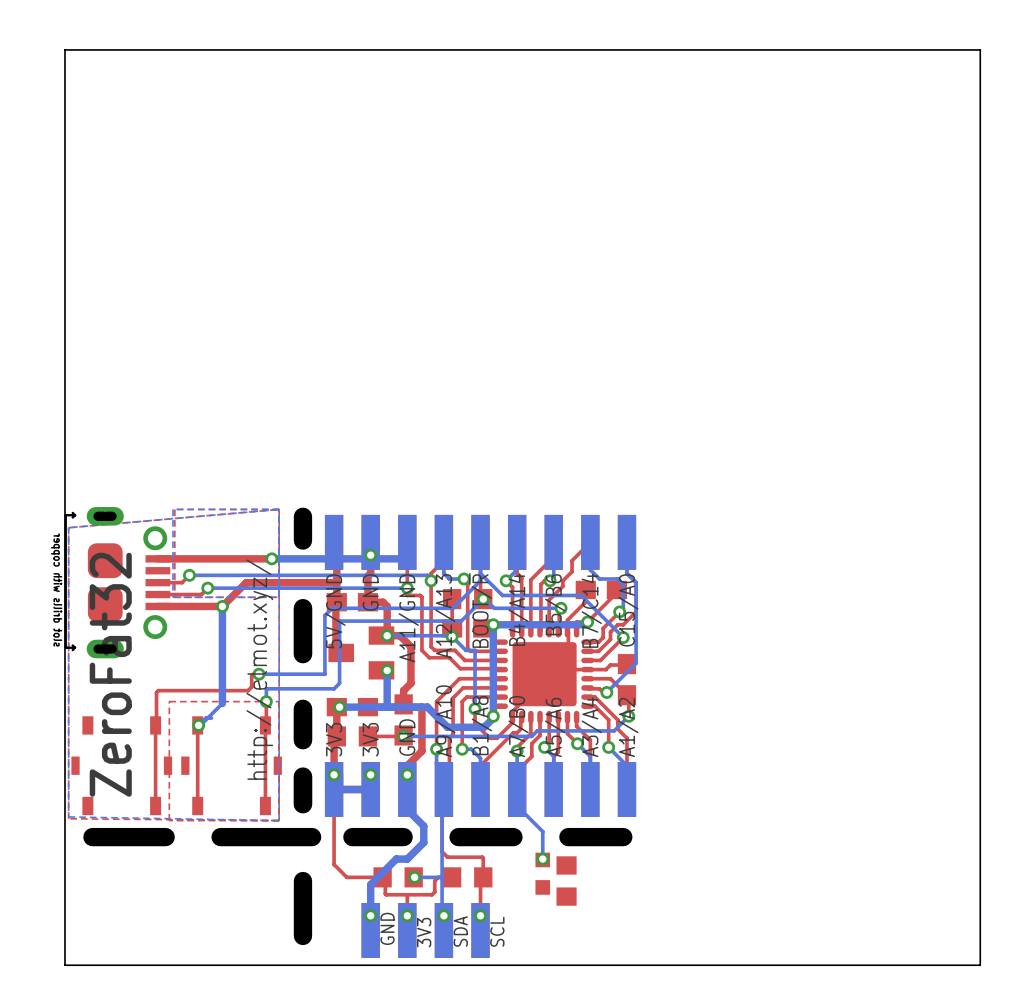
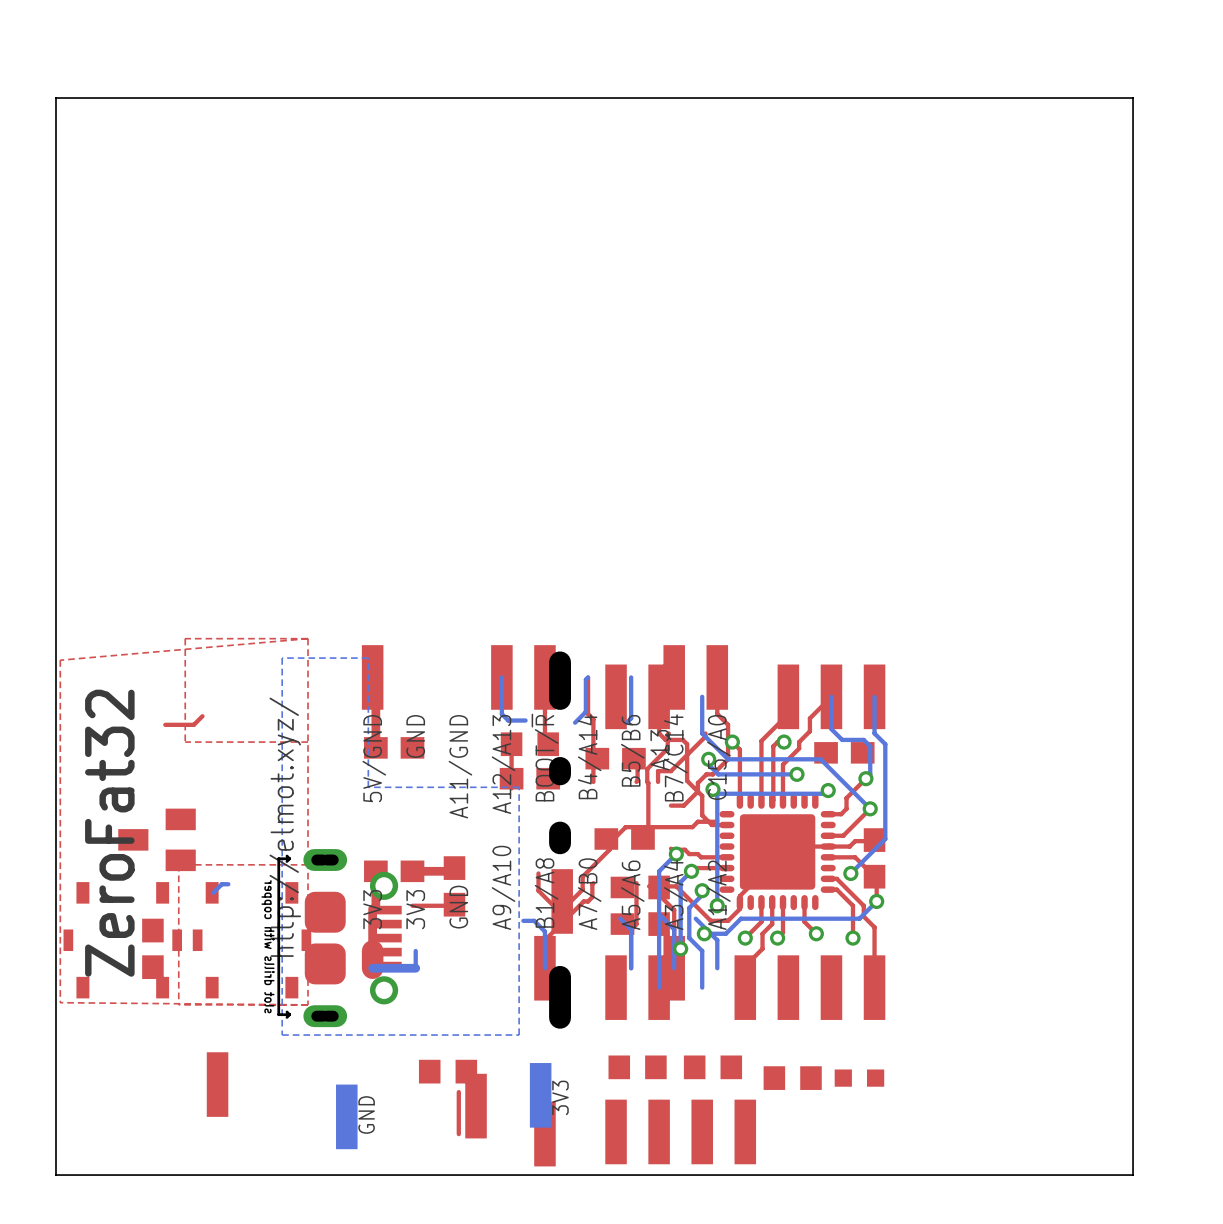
bottom zone outline: (279, 509) (68, 527) (68, 816) (279, 820) (279, 509) -> none
bottom zone outline: (279, 509) (172, 509) (172, 597) (279, 597) -> none
board edge: (302, 516) (302, 540) -> none
bottom zone outline: none -> (368, 658) (368, 787) (519, 787) (519, 1035) (282, 1035) (282, 658) (368, 658)
part: (334, 542) -> none
part: (370, 542) -> none
top track: (407, 542) (407, 595) (420, 595) (421, 597) (421, 650) (429, 657) (449, 657) (460, 668) (501, 669) -> none
bottom track: (407, 542) (407, 558) (271, 558) -> none
part side: bottom (407, 542) -> top (217, 1084)
top track: (443, 542) (443, 560) (431, 573) (431, 646) (434, 650) (454, 650) (464, 660) (501, 660) -> none
part side: bottom (443, 542) -> top (659, 696)
bottom track: (480, 542) (480, 580) (453, 608) (332, 608) (324, 615) (324, 674) (259, 674) -> none
part: (480, 542) -> none
part: (517, 542) -> none
top track: (553, 542) (553, 557) (530, 579) (530, 631) -> (788, 696) (788, 714) (761, 740) (761, 801)
part: (553, 542) -> none
top track: (590, 542) (572, 560) (572, 571) (562, 580) (562, 586) (549, 600) (549, 631) -> (831, 696) (809, 718) (809, 731) (799, 742) (799, 748) (782, 764) (782, 801)
bottom track: (590, 542) (590, 569) (599, 578) (617, 578) (623, 584) (623, 608) (619, 611) -> (831, 696) (831, 729) (842, 739) (863, 739) (870, 746) (870, 774) (865, 778)
part: (590, 542) -> none
bottom track: (626, 542) (626, 573) (636, 582) (636, 663) (606, 692) -> (874, 696) (874, 733) (885, 744) (885, 839) (850, 873)
part: (626, 542) -> none
top track: (370, 555) (370, 542) (367, 602) (382, 602) (387, 606) (387, 635) (399, 635) (410, 646) (410, 683) (403, 690) (403, 708) (405, 707) (421, 707) (421, 751) (407, 765) (407, 789) -> none
via: (370, 555) -> none
top track: (271, 558) (157, 558) -> none
via: (271, 558) -> none
part: none -> (616, 696)
top track: none -> (659, 696) (659, 733) (665, 739) (682, 739) (687, 744) (687, 780) (702, 795) (702, 815) (711, 825) (726, 825) (725, 826)
bottom track: none -> (702, 696) (702, 733) (728, 759) (820, 759) (870, 808)
part: none -> (788, 696)
part: none -> (831, 696)
part: none -> (874, 696)
bottom track: (480, 573) (502, 595) (581, 595) (623, 637) -> none
bottom track: (189, 575) (427, 575) (431, 580) -> none
via: (189, 575) -> none
top track: (464, 578) (467, 582) (467, 648) (470, 651) (500, 652) -> none
via: (464, 578) -> none
via: (431, 580) -> none
top track: (506, 580) (512, 587) (512, 631) -> (732, 742) (739, 749) (739, 801)
via: (506, 580) -> none
top track: (550, 580) (544, 580) (540, 584) (540, 631) -> (784, 742) (777, 742) (773, 746) (772, 801)
via: (550, 580) -> none
part position: (117, 582) -> (339, 938)
top track: (336, 582) (246, 582) (222, 606) (157, 606) -> none
top track: (207, 588) (201, 594) (157, 594) -> none
via: (207, 588) -> none
bottom track: (407, 588) (207, 588) -> none
via: (407, 588) -> none
part: (601, 589) -> none
via: none -> (732, 742)
via: none -> (784, 742)
via: (483, 599) -> none
bottom track: (222, 606) (222, 703) (202, 723) (202, 727) -> none
via: (222, 606) -> none
top track: (332, 606) (335, 605) (335, 604) (336, 603) (336, 602) (335, 647) (341, 652) -> none
part: none -> (844, 752)
board edge: (302, 608) (302, 654) -> none
bottom track: (561, 608) (494, 608) (483, 599) (461, 621) (339, 621) (339, 683) (334, 688) (266, 688) (266, 701) -> none
via: (561, 608) -> none
part: none -> (615, 758)
top track: (619, 611) (603, 628) (603, 637) (598, 642) (587, 642) -> (865, 778) (846, 798) (846, 808) (841, 814) (828, 814)
bottom track: none -> (705, 761) (718, 774) (796, 774)
board edge: none -> (560, 767) (560, 774)
bottom track: (587, 622) (584, 624) (493, 624) -> none
via: (587, 622) -> none
bottom track: (493, 624) (493, 718) (484, 727) (447, 727) (427, 707) (339, 707) -> none
via: (493, 624) -> none
part footprint: [495, 624, 595, 724] -> [594, 828, 655, 850]
via: none -> (796, 774)
via: none -> (865, 778)
bottom track: (387, 635) (451, 635) (465, 650) (475, 650) (475, 708) -> none
via: (387, 635) -> none
via: (452, 636) -> none
top track: (623, 637) (600, 660) (587, 660) -> (870, 808) (843, 835) (828, 835)
bottom track: none -> (828, 790) (824, 793) (717, 793) (717, 905)
via: none -> (828, 790)
part position: (361, 652) -> (157, 839)
via: none -> (870, 808)
bottom track: (387, 670) (387, 707) -> none
via: (387, 670) -> none
top track: (259, 674) (251, 676) (251, 686) (248, 690) (158, 690) (156, 692) (155, 805) -> none
via: (259, 674) -> none
board edge: none -> (560, 832) (560, 843)
top track: (501, 678) (459, 678) (436, 701) (436, 749) -> none
top track: (587, 678) (610, 678) (628, 697) (628, 716) -> (828, 857) (855, 857) (876, 878) (876, 901)
part: (626, 679) -> none
top track: none -> (874, 840) (855, 841) (849, 846) (782, 846) (766, 862) (766, 869) (739, 896) (739, 909) (728, 920) (710, 920) (676, 886) (649, 886) (659, 887)
top track: (501, 687) (463, 687) (453, 697) (453, 734) (449, 738) (449, 774) (443, 780) (442, 851) (447, 857) (483, 858) (483, 877) (480, 880) (480, 930) (477, 930) -> none
part: none -> (777, 851)
bottom track: none -> (676, 854) (659, 871) (659, 987)
via: none -> (676, 854)
top track: none -> (693, 854) (697, 854) (701, 857) (726, 857)
via: (606, 692) -> none
part: none -> (874, 858)
top track: (501, 697) (466, 697) (462, 701) (462, 749) -> none
top track: (587, 697) (594, 697) (617, 719) (617, 729) (626, 738) (626, 789) -> (828, 878) (836, 878) (863, 905) (863, 916) (874, 927) (874, 987)
top track: (266, 701) (265, 805) -> none
via: (266, 701) -> none
top track: none -> (726, 868) (694, 868) (691, 871)
top track: (587, 706) (594, 706) (608, 719) (608, 747) -> (828, 889) (836, 889) (852, 905) (852, 938)
via: (339, 707) -> none
bottom track: none -> (691, 871) (680, 882) (680, 948)
via: none -> (691, 871)
board edge: (302, 708) (302, 740) -> (560, 662) (560, 698)
via: (475, 708) -> none
via: none -> (850, 873)
via: (493, 716) -> none
bottom track: (628, 716) (614, 730) (537, 730) (531, 736) (403, 736) -> none
via: (628, 716) -> none
top track: (530, 717) (530, 733) (517, 747) (517, 751) -> none
top track: (540, 717) (540, 735) (531, 743) (531, 756) (517, 771) (517, 789) -> (772, 902) (772, 924) (762, 933) (762, 948) (745, 966) (745, 987)
top track: (549, 717) (549, 742) (544, 747) -> (782, 902) (782, 932) (777, 938)
top track: (567, 717) (567, 733) (577, 743) -> (804, 902) (804, 921) (816, 933)
top track: (196, 719) (197, 805) -> none
bottom track: none -> (702, 890) (702, 895) (689, 907) (689, 938) (702, 951) (702, 987)
via: none -> (702, 890)
via: (198, 725) -> none
part: none -> (562, 901)
bottom track: none -> (876, 901) (859, 918) (740, 918) (725, 933) (704, 933)
via: none -> (876, 901)
top track: none -> (761, 902) (761, 921) (745, 938)
part: (352, 736) -> none
via: (403, 736) -> none
part: none -> (622, 905)
part: none -> (659, 905)
via: none -> (717, 905)
via: (577, 743) -> none
via: (544, 747) -> none
via position: (608, 747) -> (704, 933)
bottom track: (436, 749) (436, 763) (443, 771) (443, 789) (442, 791) (442, 913) (443, 915) (443, 930) -> none
via: (436, 749) -> none
via: (462, 749) -> none
bottom track: (517, 751) (517, 789) (522, 794) (522, 811) (542, 831) (542, 859) -> none
via: (517, 751) -> none
via: none -> (816, 933)
via: none -> (745, 938)
via: none -> (777, 938)
via: none -> (852, 938)
top track: (373, 772) (370, 774) (370, 789) (334, 789) (334, 864) (346, 877) (382, 877) (385, 880) (386, 894) (432, 894) (434, 892) (434, 881) (438, 877) (452, 877) -> none
part: none -> (152, 948)
via: none -> (680, 948)
via: (334, 774) -> none
via: (370, 774) -> none
bottom track: (407, 774) (407, 789) (410, 793) (410, 813) (423, 826) (423, 842) (407, 859) (396, 859) (370, 884) (370, 930) -> none
via: (407, 774) -> none
board edge: (302, 776) (302, 804) -> none
part: (334, 789) -> none
part: (370, 789) -> none
part: (407, 789) -> none
part: (443, 789) -> none
part: (480, 789) -> none
part: (517, 789) -> none
part: (553, 789) -> none
part: (590, 789) -> none
part: (626, 789) -> none
board edge: none -> (560, 976) (560, 1017)
part: none -> (616, 987)
part: none -> (659, 987)
part: none -> (745, 987)
part: none -> (788, 987)
part: none -> (831, 987)
part: none -> (874, 987)
board edge: (165, 837) (92, 837) -> none
board edge: (312, 837) (220, 837) -> none
board edge: (403, 837) (352, 837) -> none
board edge: (513, 837) (458, 837) -> none
board edge: (623, 837) (568, 837) -> none
via: (542, 859) -> none
part rotation: 0° (542, 873) -> 90° clockwise (859, 1078)
part position: (542, 873) -> (859, 1078)
part: none -> (712, 1067)
via: (414, 877) -> none
bottom track: (442, 877) (414, 877) -> none
part: (467, 877) -> none
board edge: (302, 881) (302, 935) -> none
part rotation: 0° (566, 881) -> 90° clockwise (637, 1067)
part: none -> (792, 1078)
part: none -> (476, 1106)
via: (370, 915) -> none
via: (407, 915) -> none
via: (443, 915) -> none
via: (480, 915) -> none
part: none -> (616, 1131)
part: none -> (659, 1131)
part: none -> (702, 1131)
part: none -> (745, 1131)
part position: (370, 930) -> (346, 1116)
part position: (407, 930) -> (540, 1095)
part: SDA (443, 930) -> none
part: SCL (480, 930) -> none

